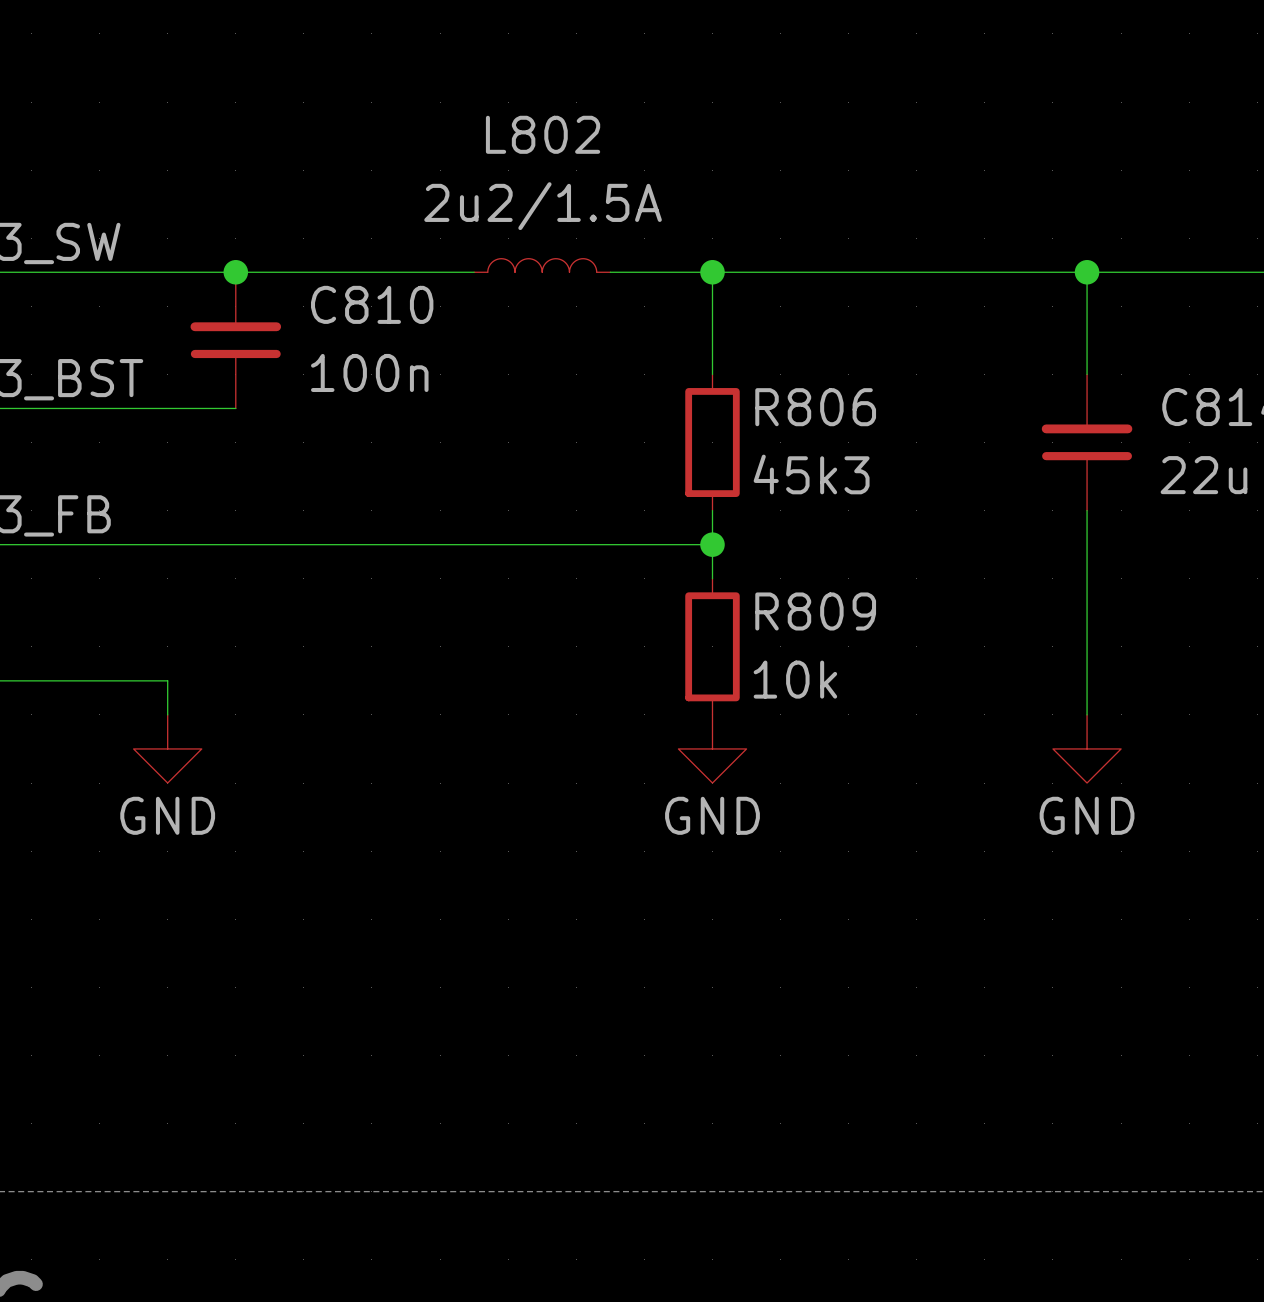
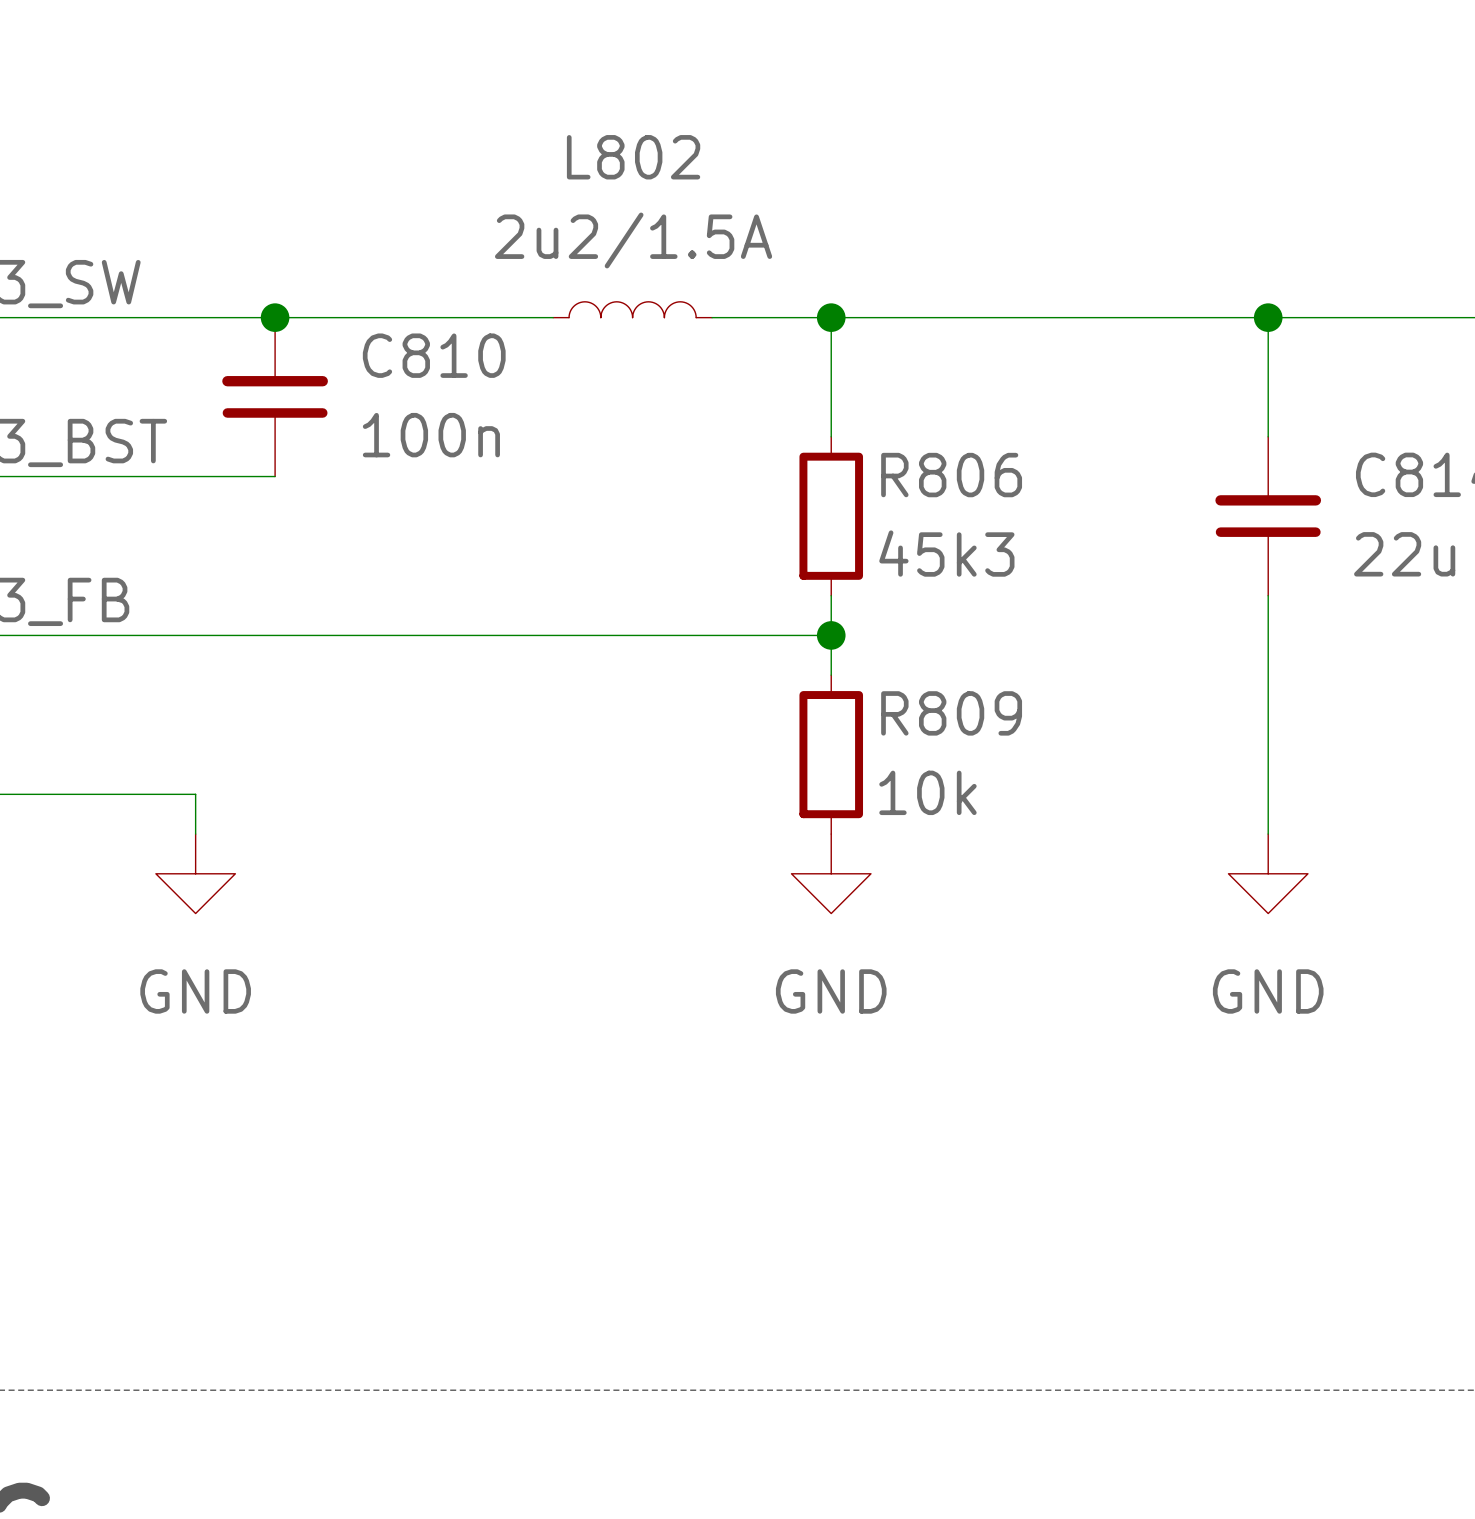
power symbol text position: GND (167, 815) -> GND (195, 991)
power symbol text position: GND (712, 815) -> GND (831, 991)
power symbol text position: GND (1087, 815) -> GND (1268, 991)

